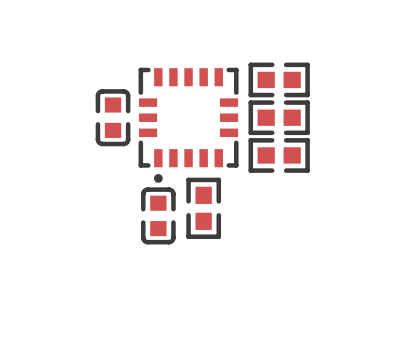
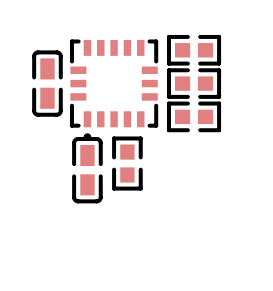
part footprint: [95, 89, 131, 147] -> [32, 50, 63, 117]
part footprint: [140, 187, 176, 245] -> [72, 137, 103, 204]

